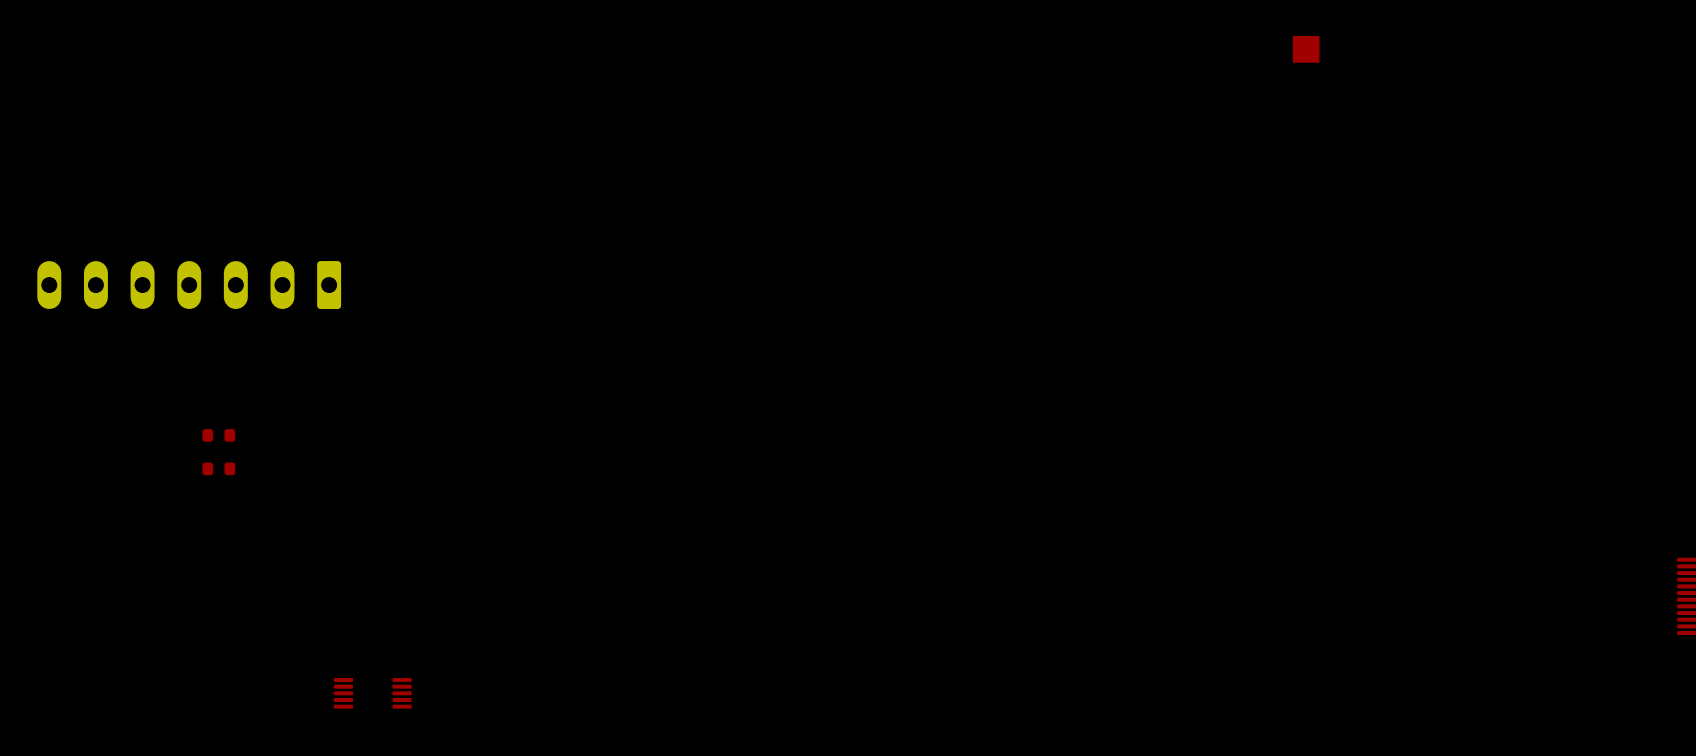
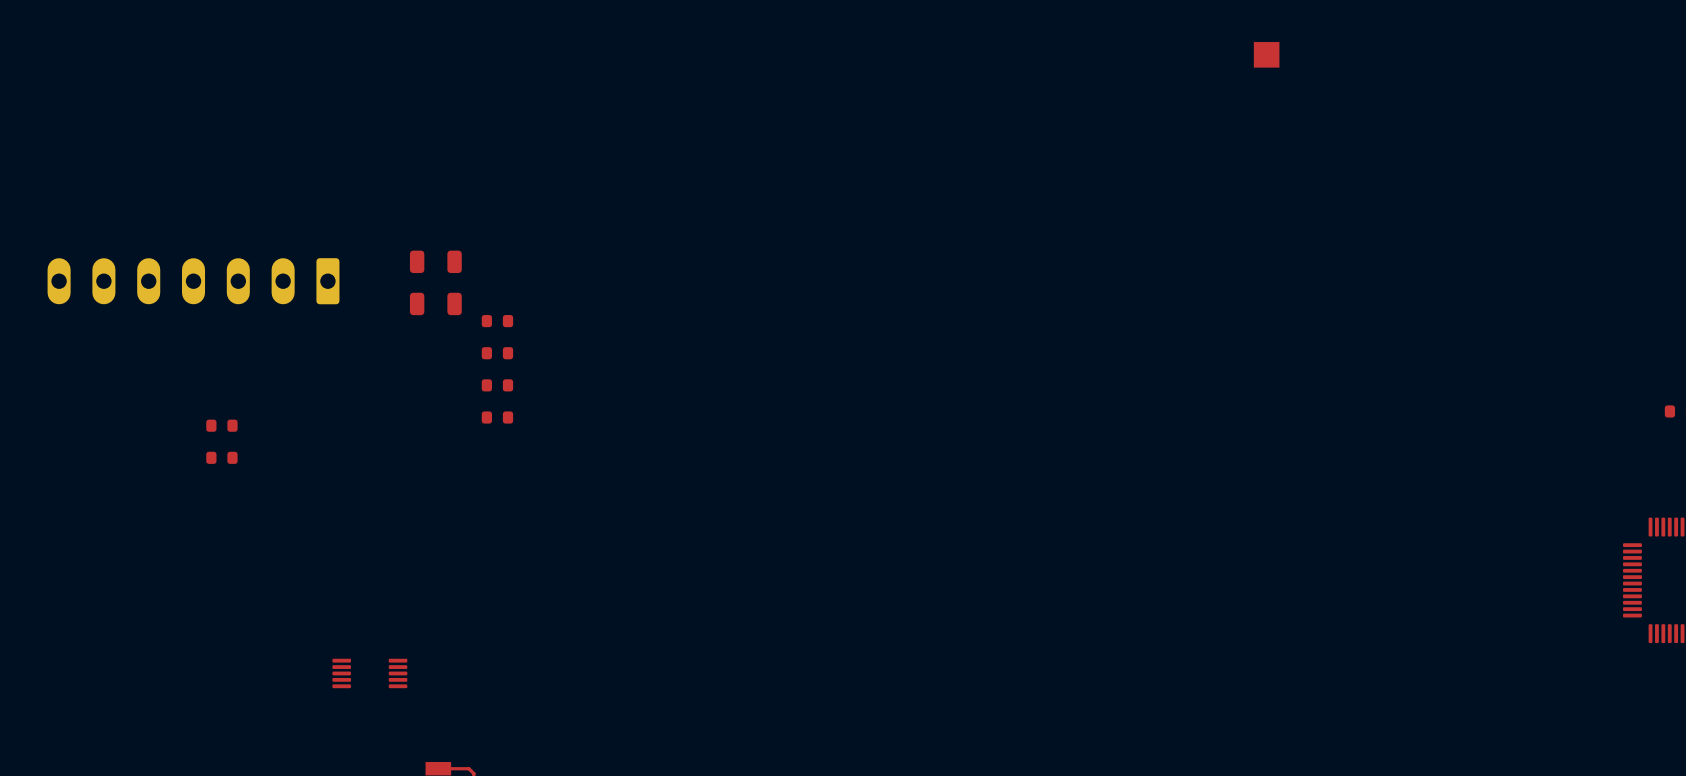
part: none -> (435, 261)
part: none -> (435, 303)
part: none -> (497, 321)
part: none -> (497, 353)
part: none -> (497, 385)
part: none -> (497, 417)

